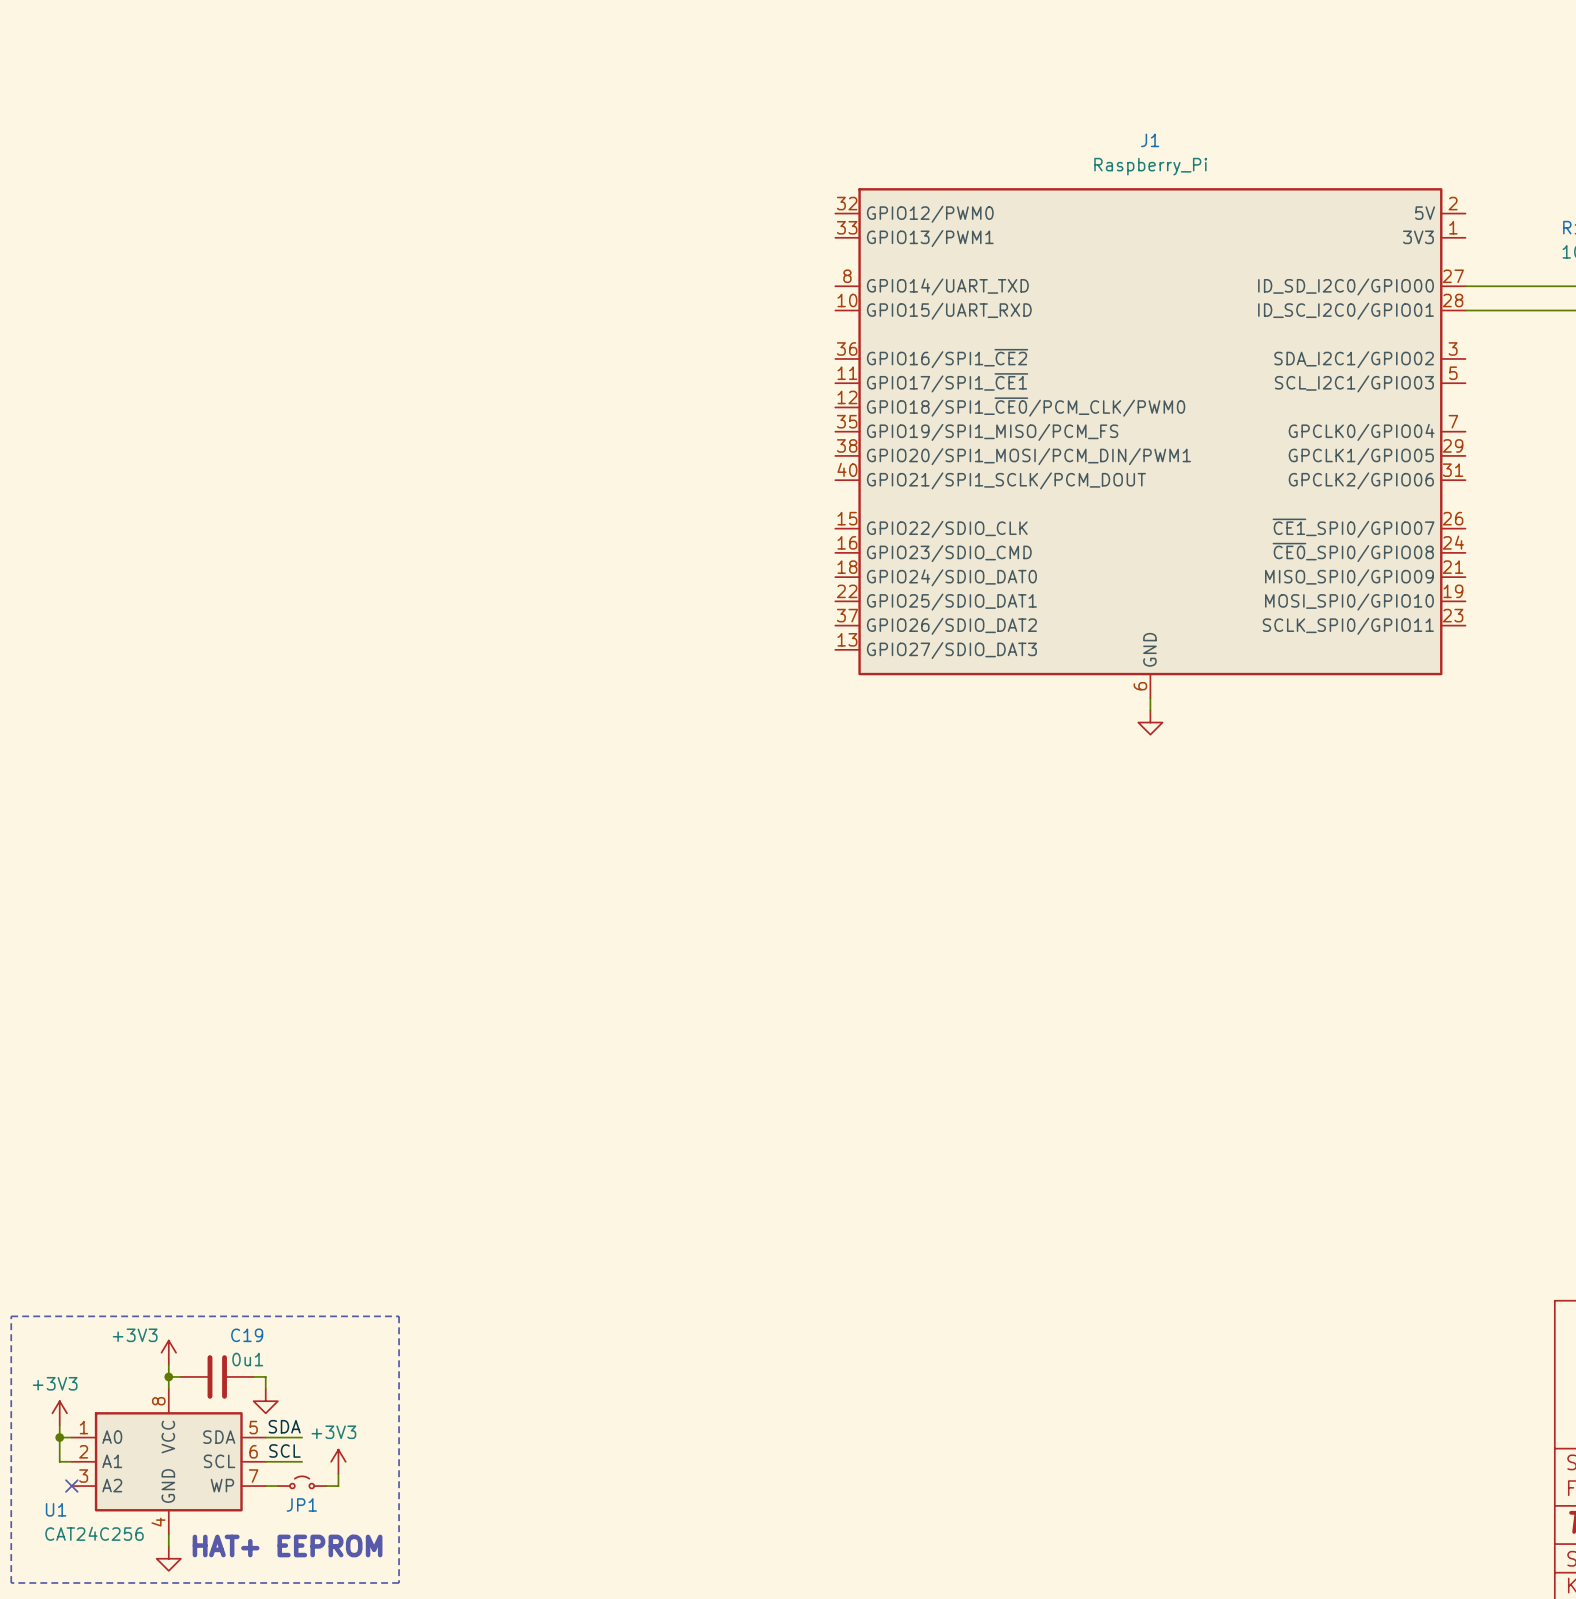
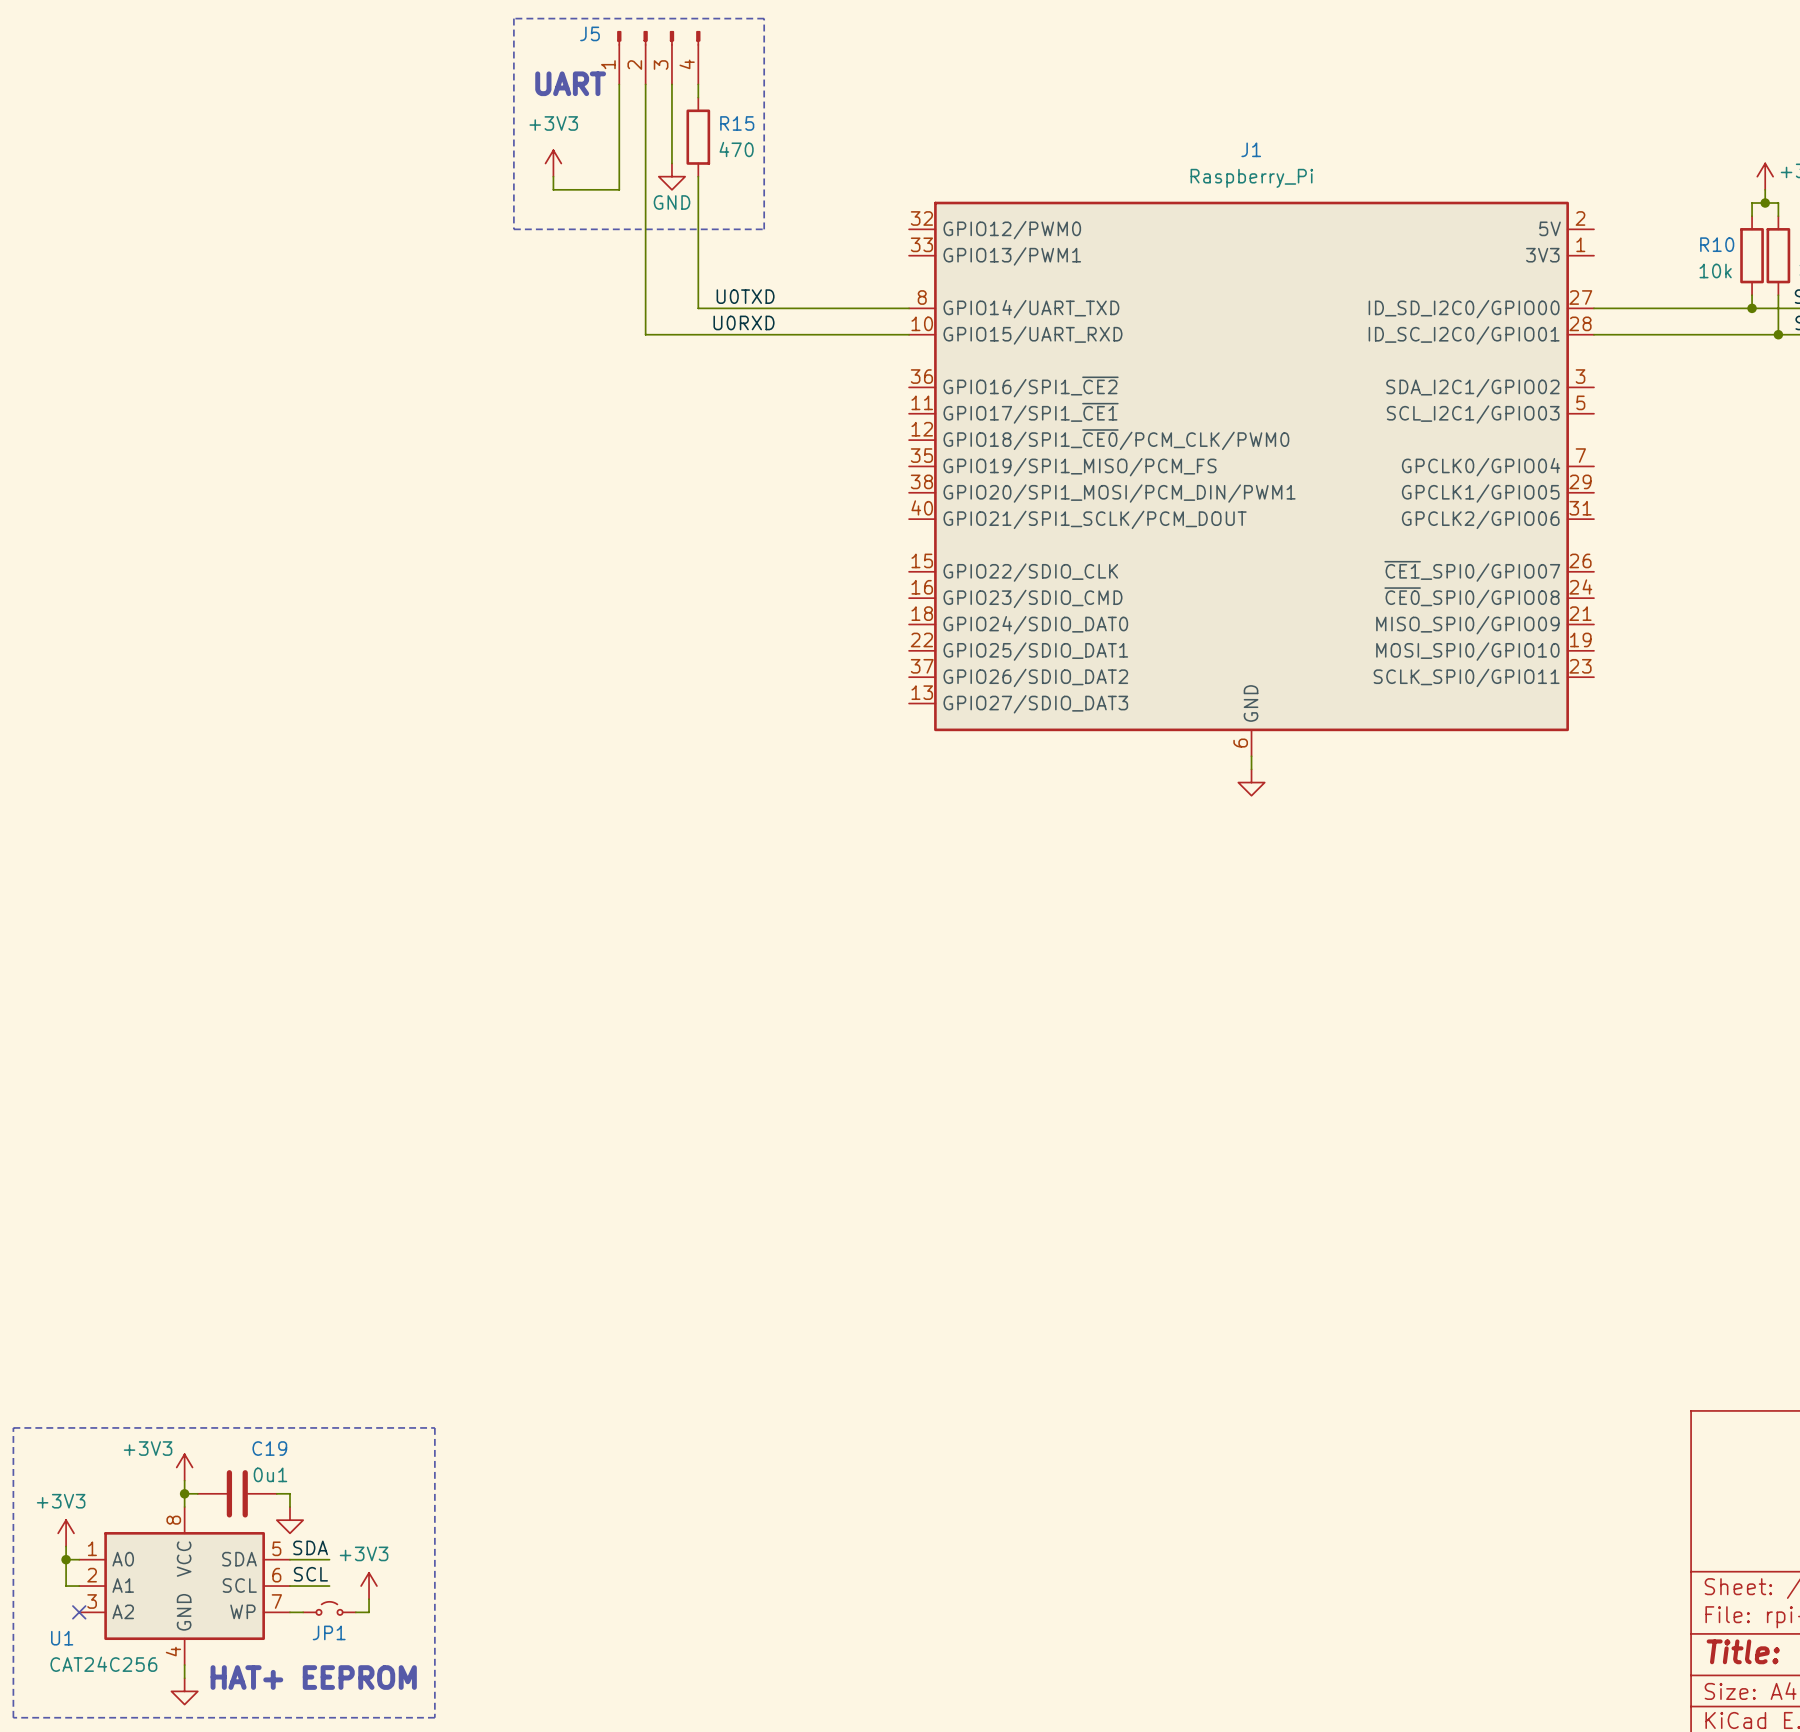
line: none -> (513, 18) (764, 18) (764, 229) (513, 229) (513, 18)
J5: none -> (658, 57)
text: none -> UART (570, 83)
wire: none -> (619, 84) (619, 189) (553, 189) (553, 176)
wire: none -> (645, 84) (645, 334) (909, 334)
wire: none -> (671, 84) (671, 163)
wire: none -> (698, 84) (698, 97)
R15: none -> 470 (698, 137)
power symbol: none -> +3V3 (553, 163)
power symbol: none -> GND (671, 176)
wire: none -> (698, 176) (698, 308) (909, 308)
label: none -> U0TXD (745, 296)
label: none -> U0RXD (744, 322)

